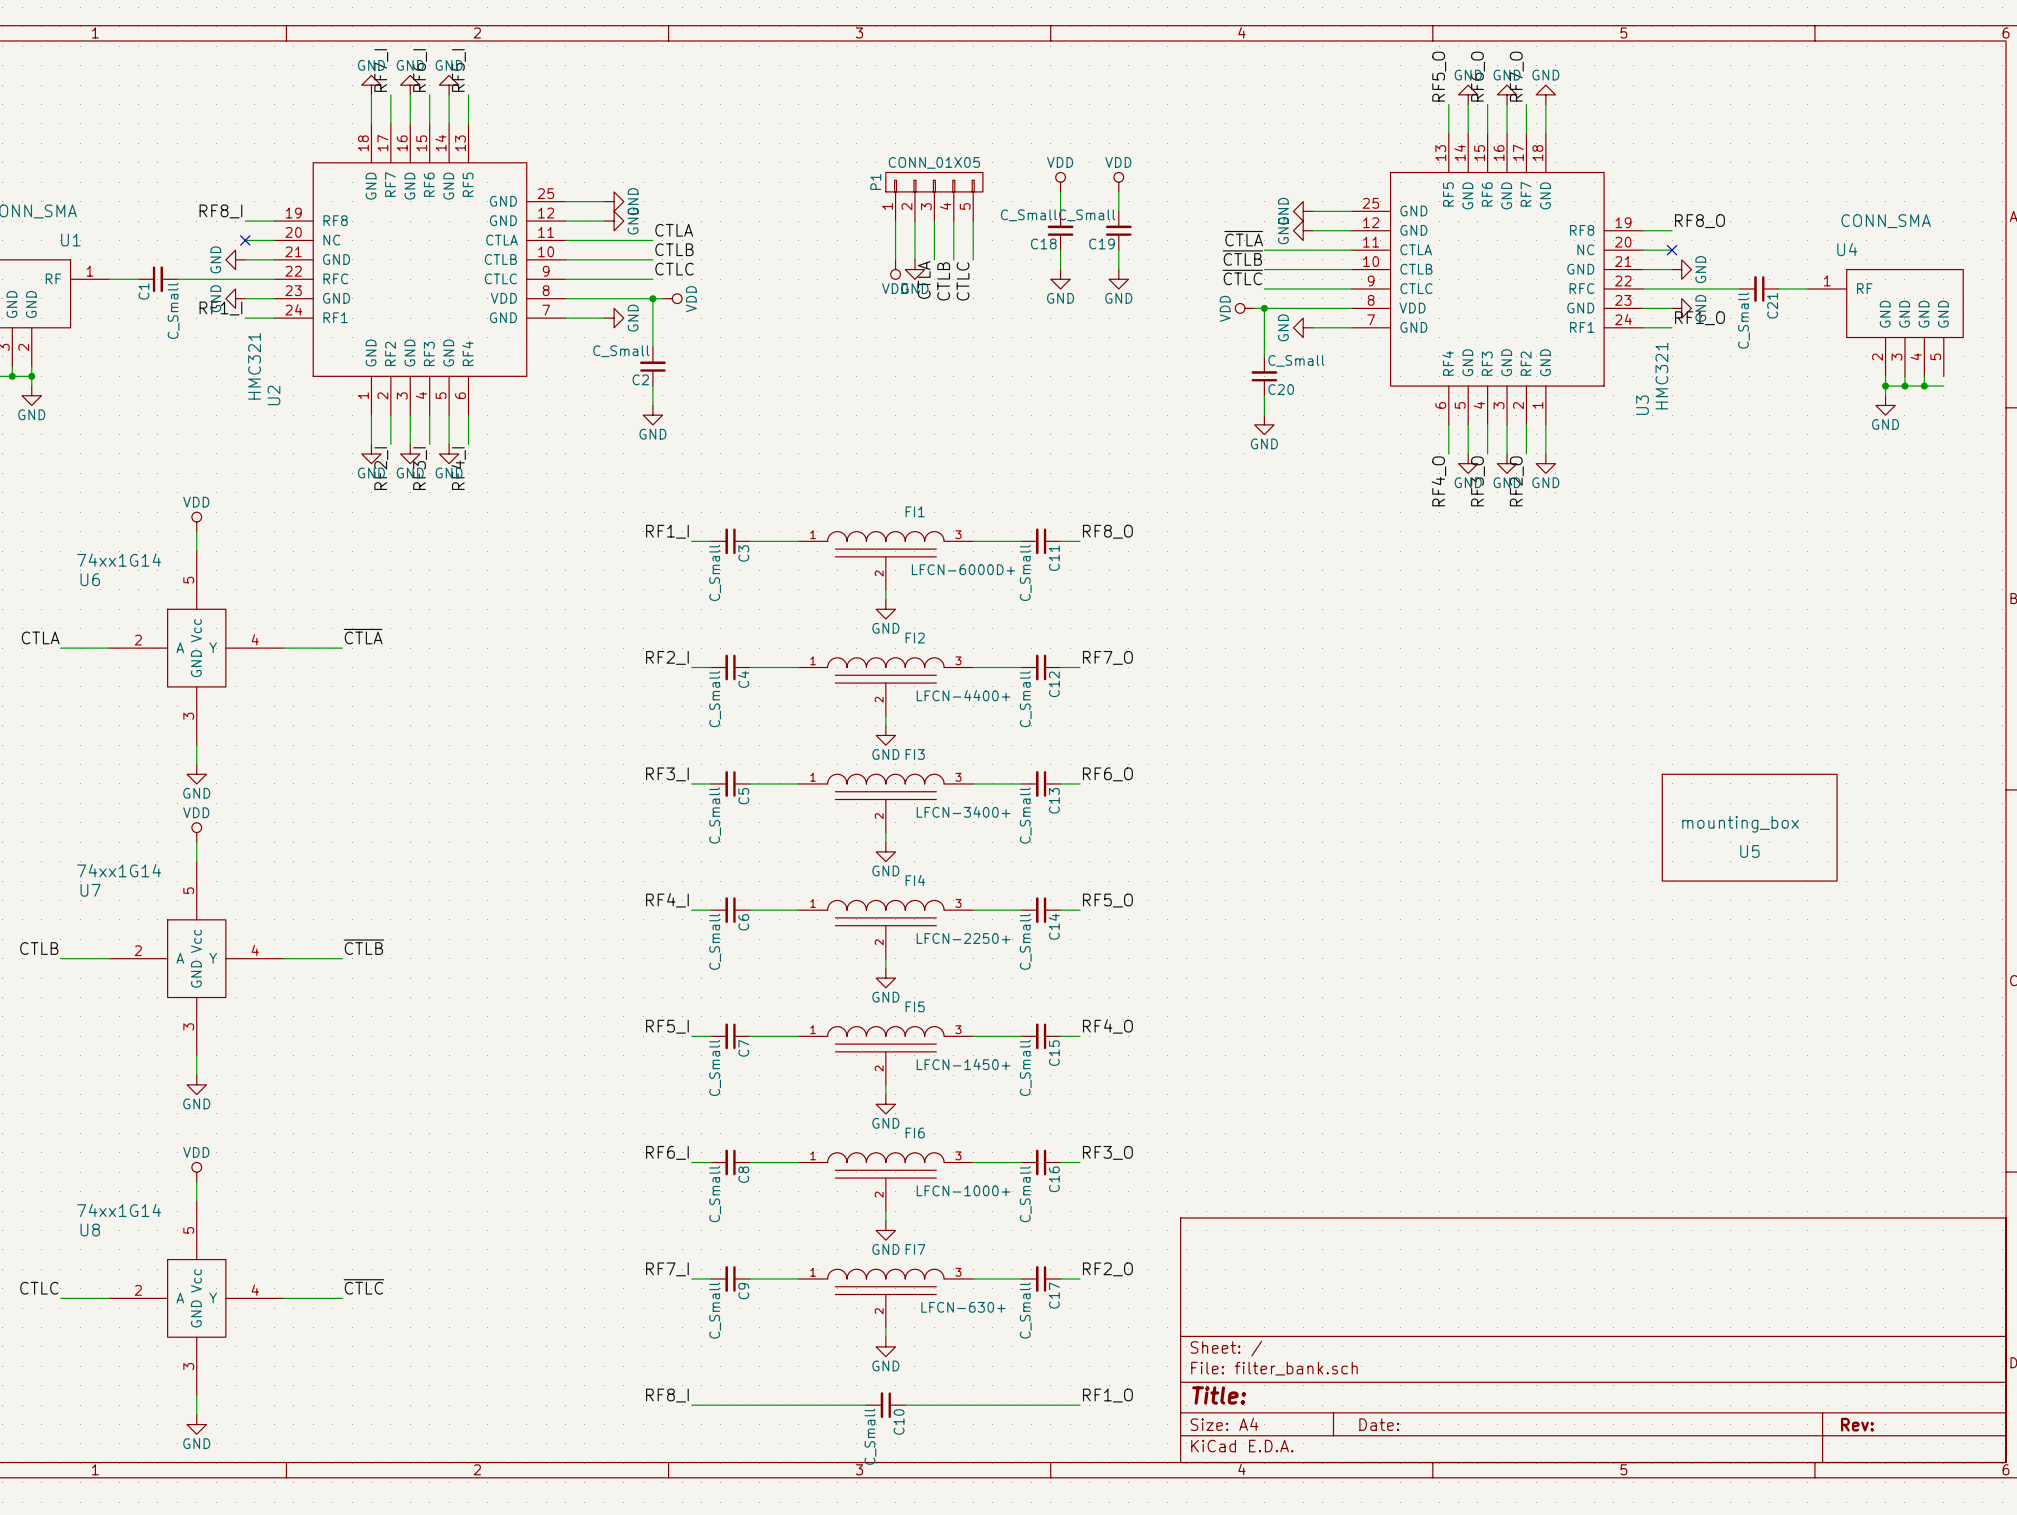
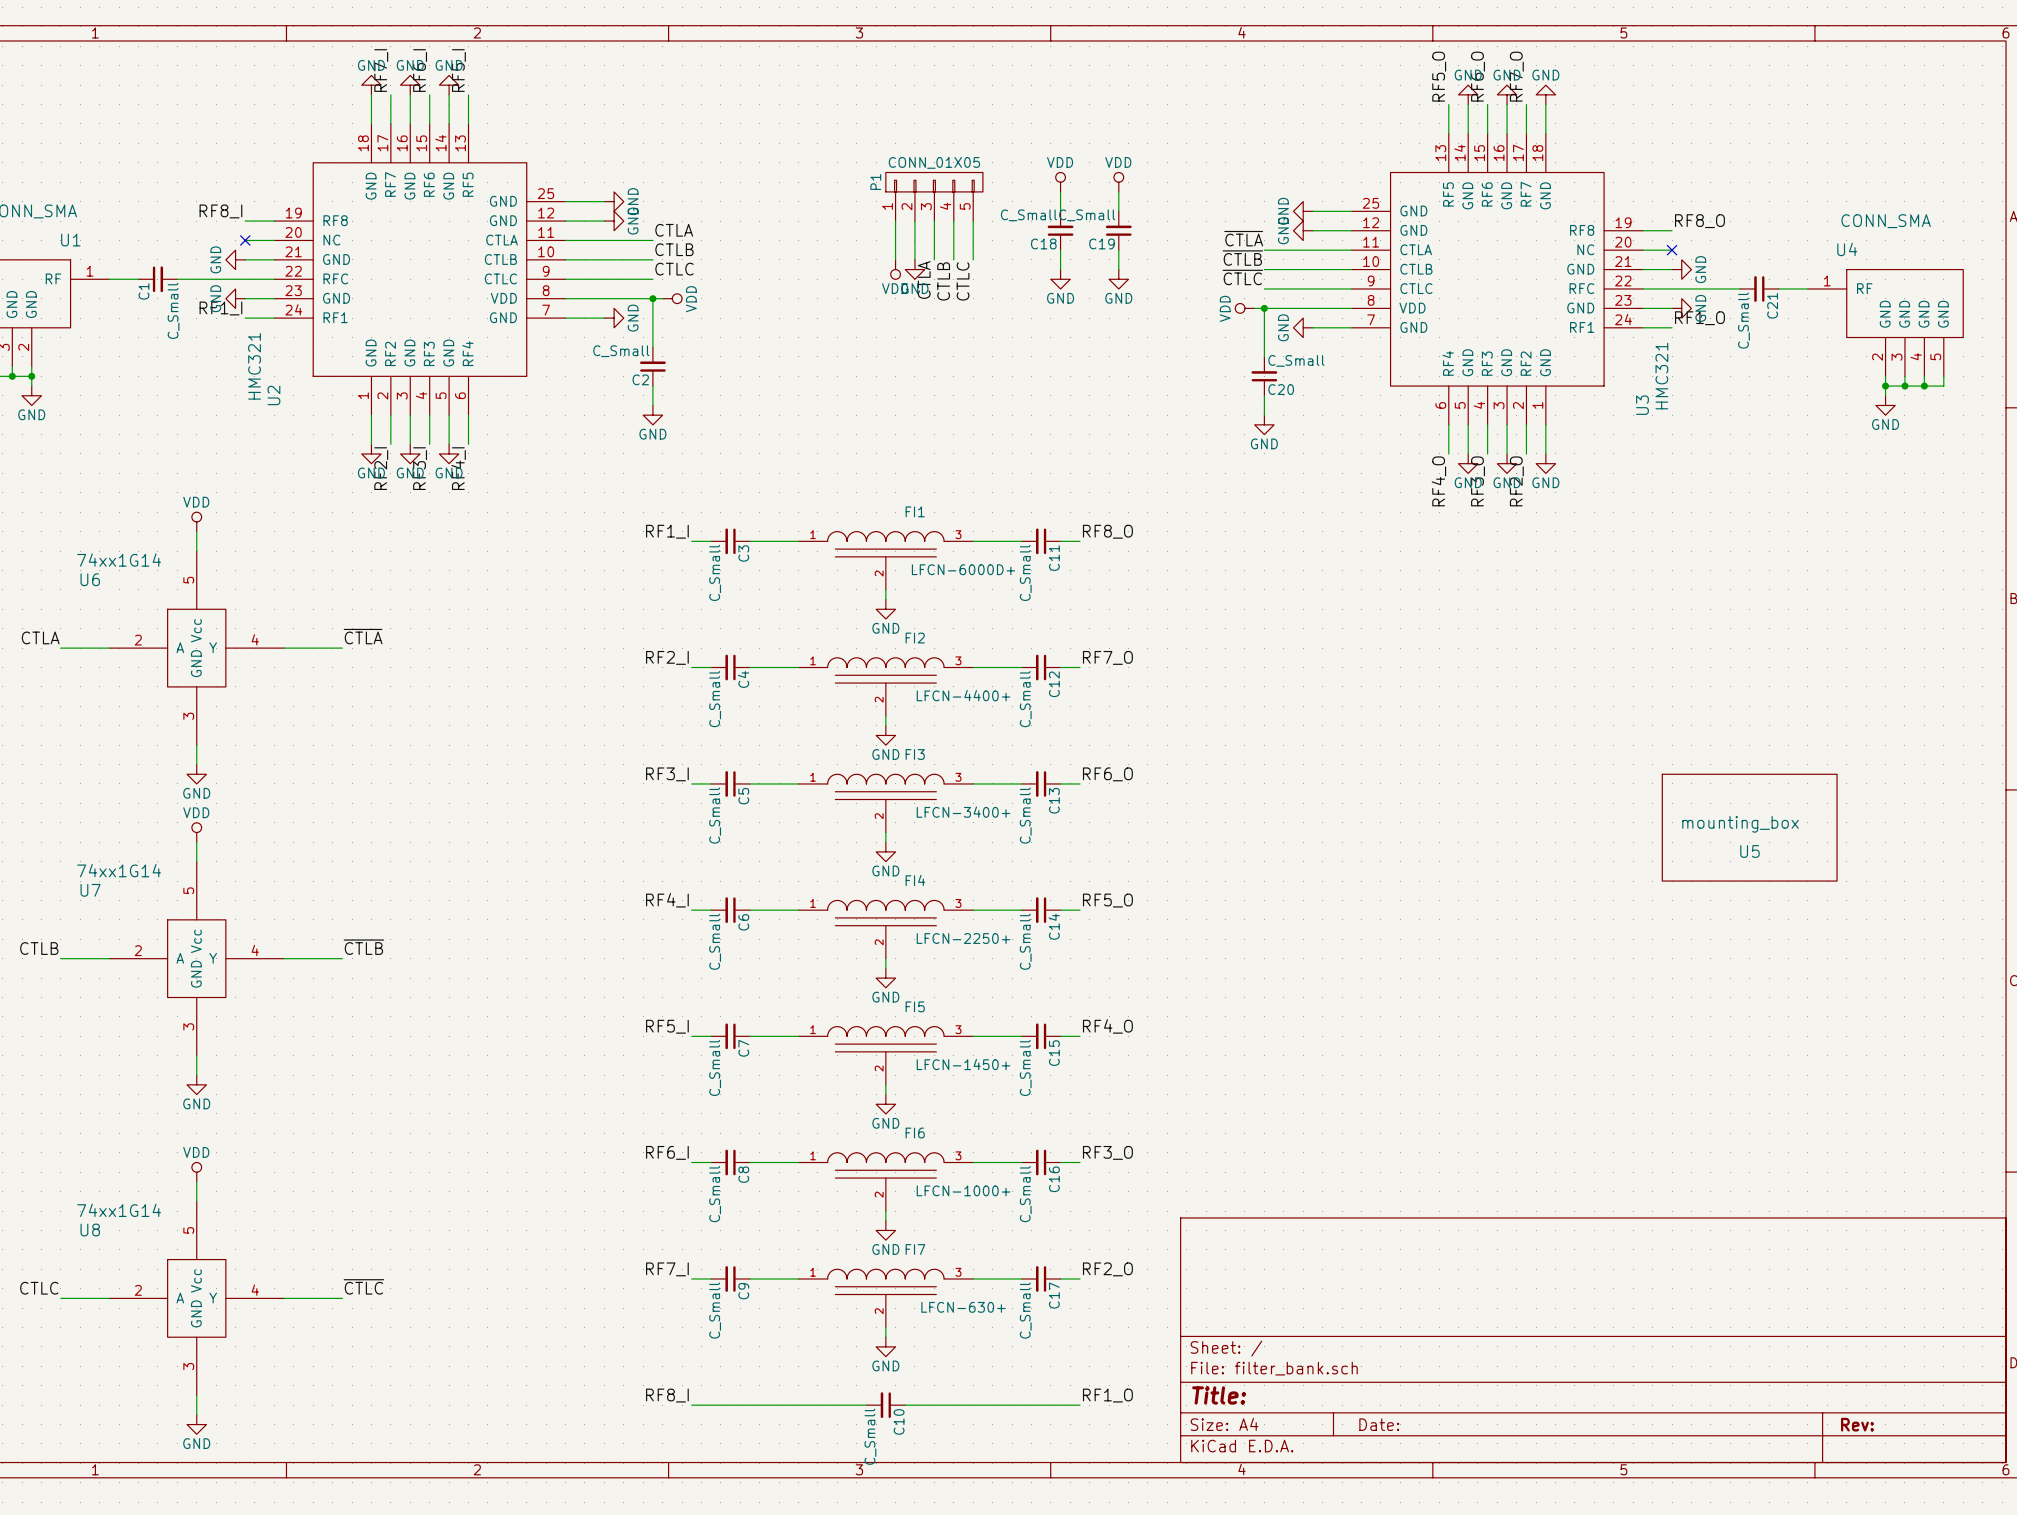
wire: none -> (1943, 376) (1943, 386)

